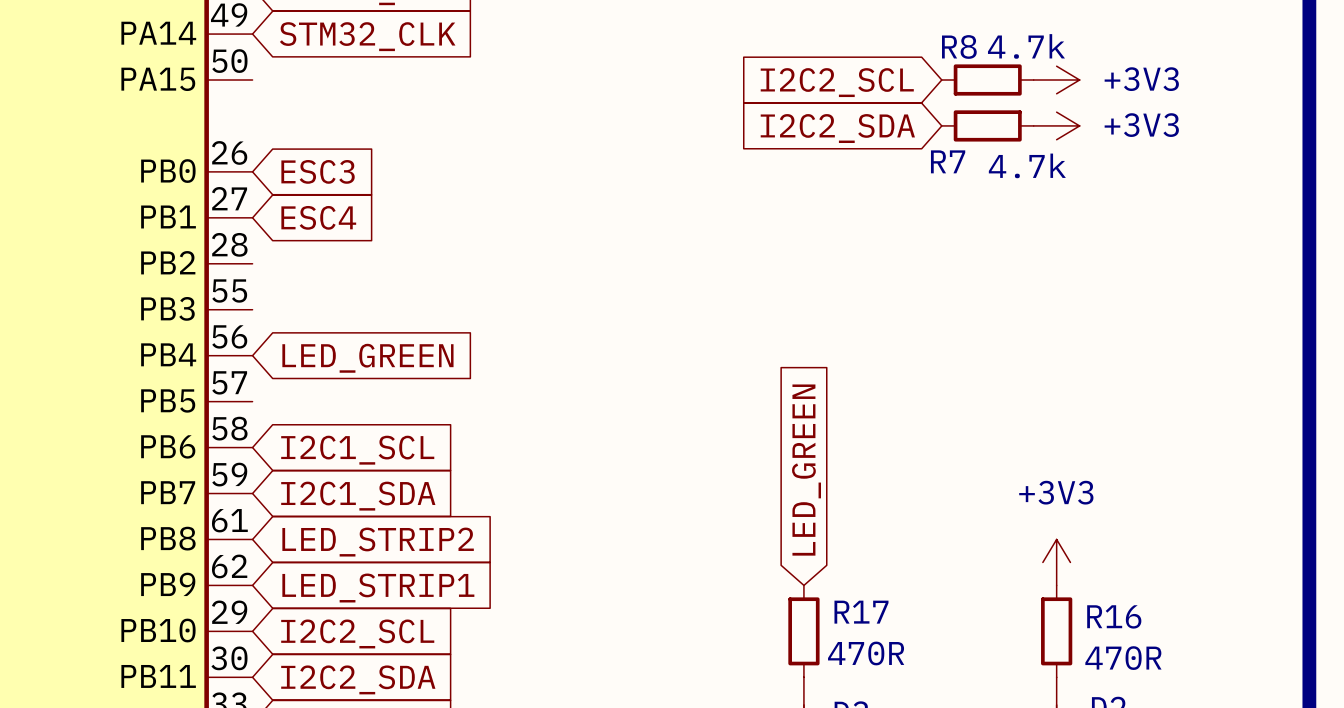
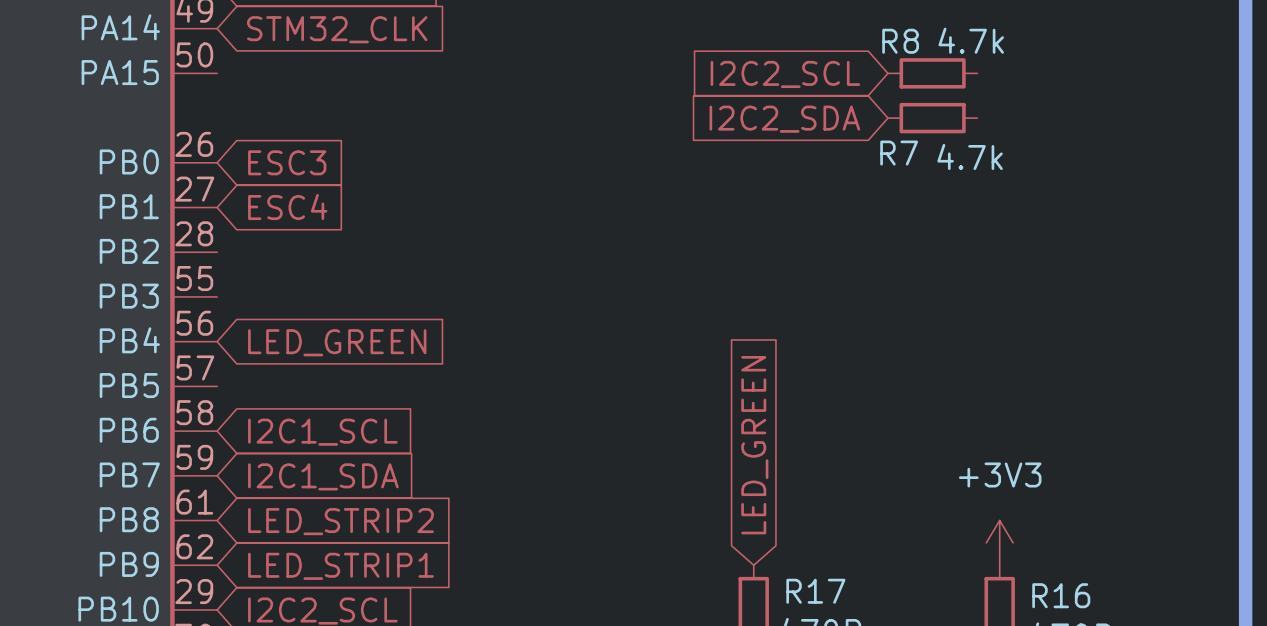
power symbol: +3V3 (1056, 80) -> none
power symbol: +3V3 (1056, 125) -> none

